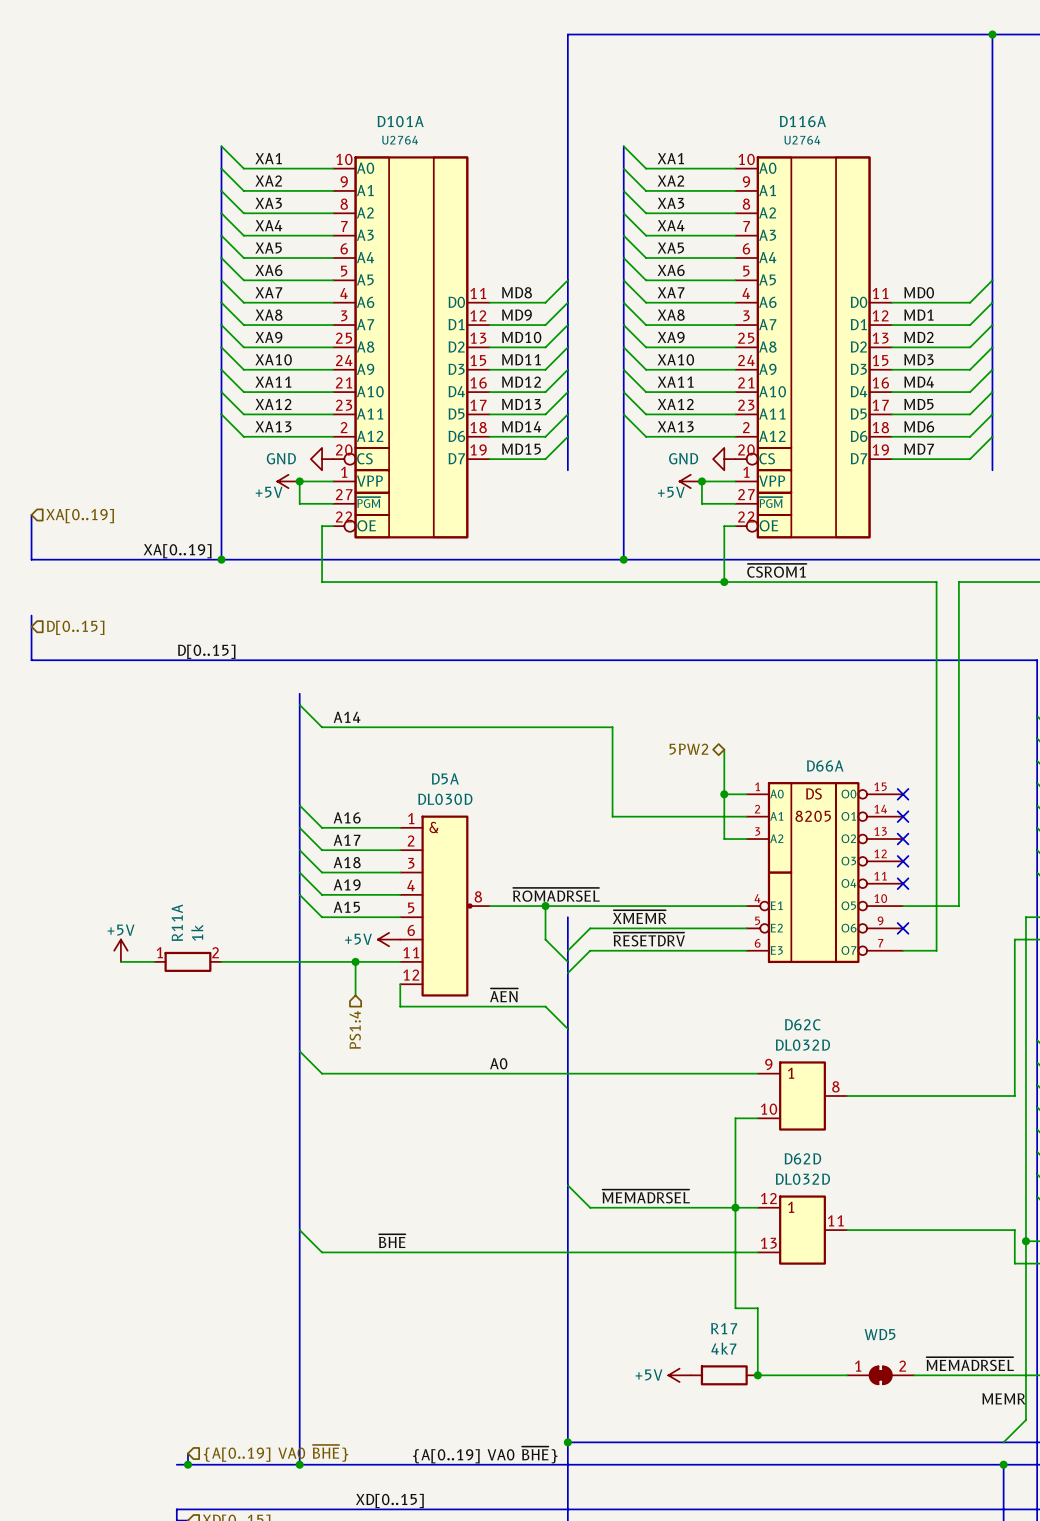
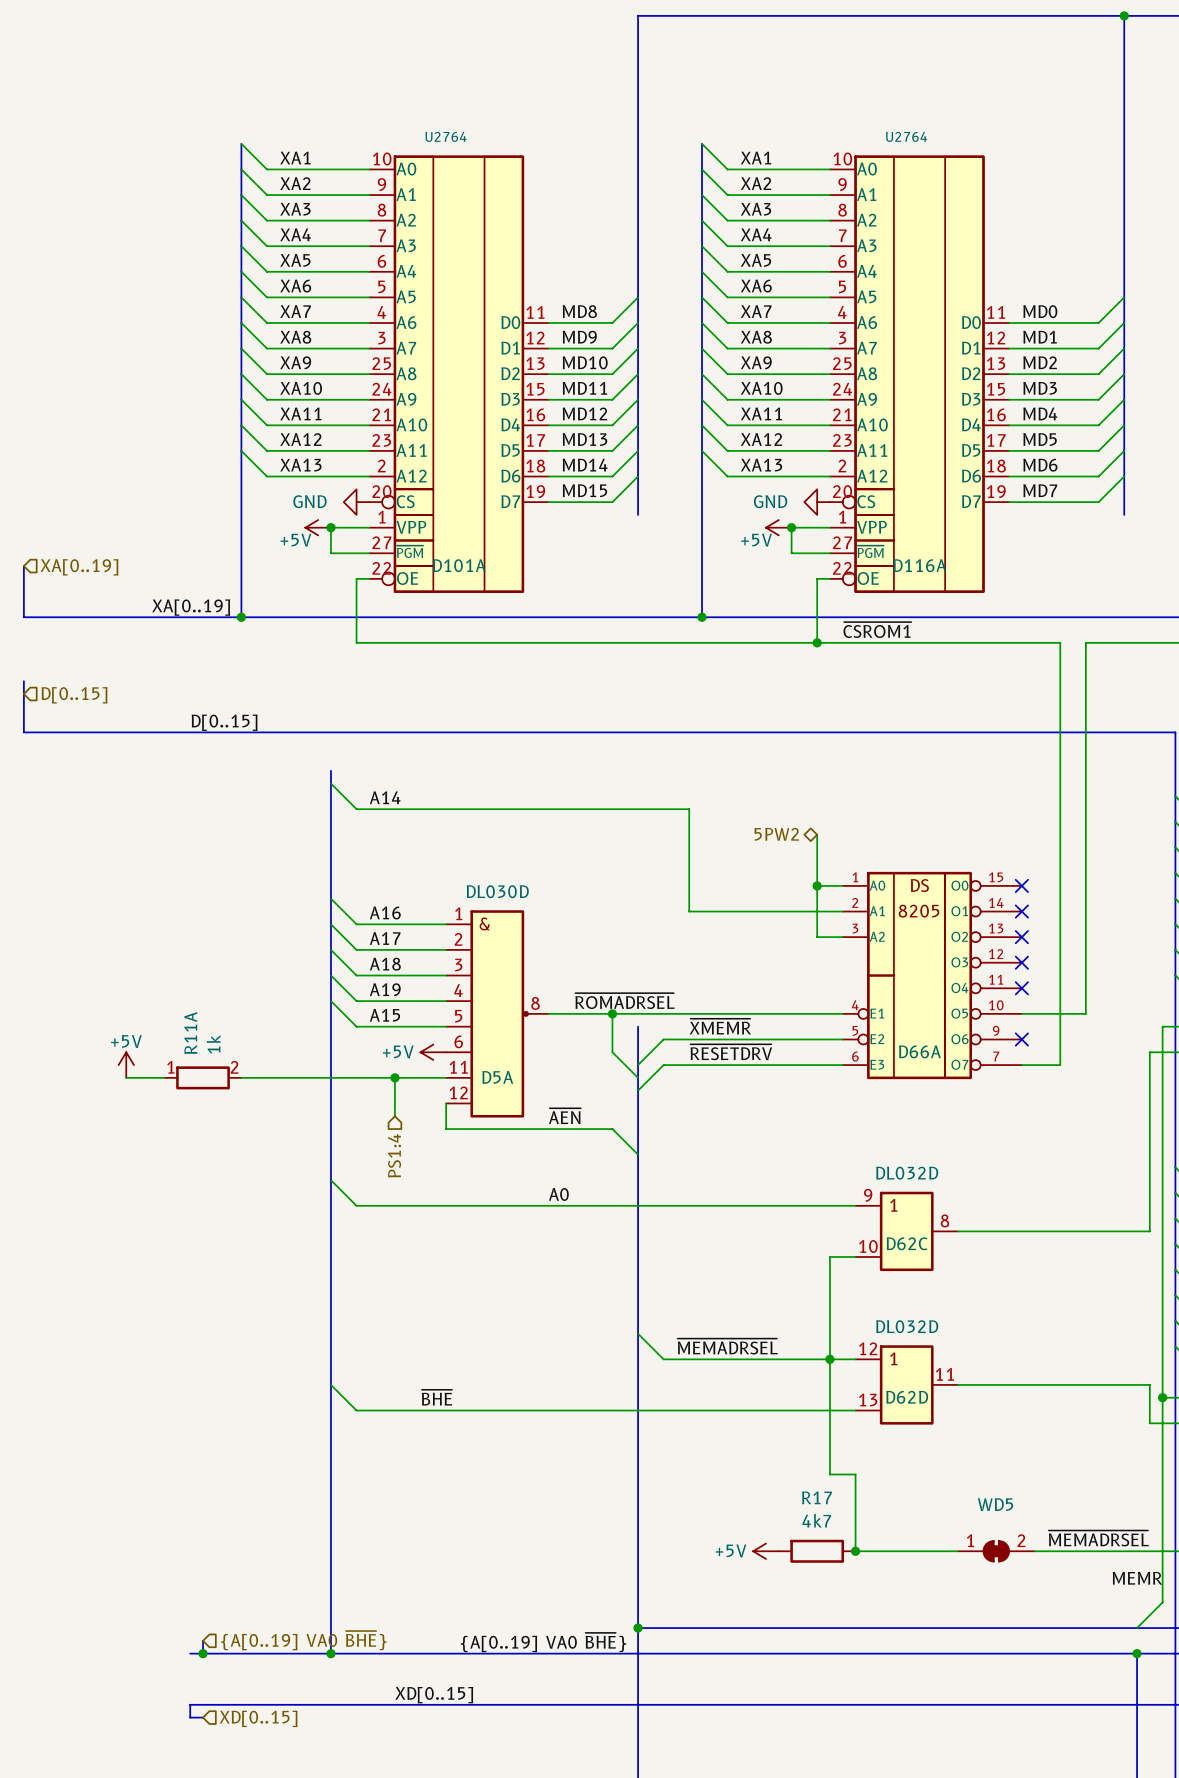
D101A name position: D101A (400, 121) -> D101A (459, 565)
D116A name position: D116A (802, 121) -> D116A (919, 565)
D66A name position: D66A (825, 766) -> D66A (919, 1051)
D5A name position: D5A (445, 778) -> D5A (497, 1077)
D62C name position: D62C (802, 1024) -> D62C (907, 1243)
D62D name position: D62D (802, 1158) -> D62D (907, 1397)

